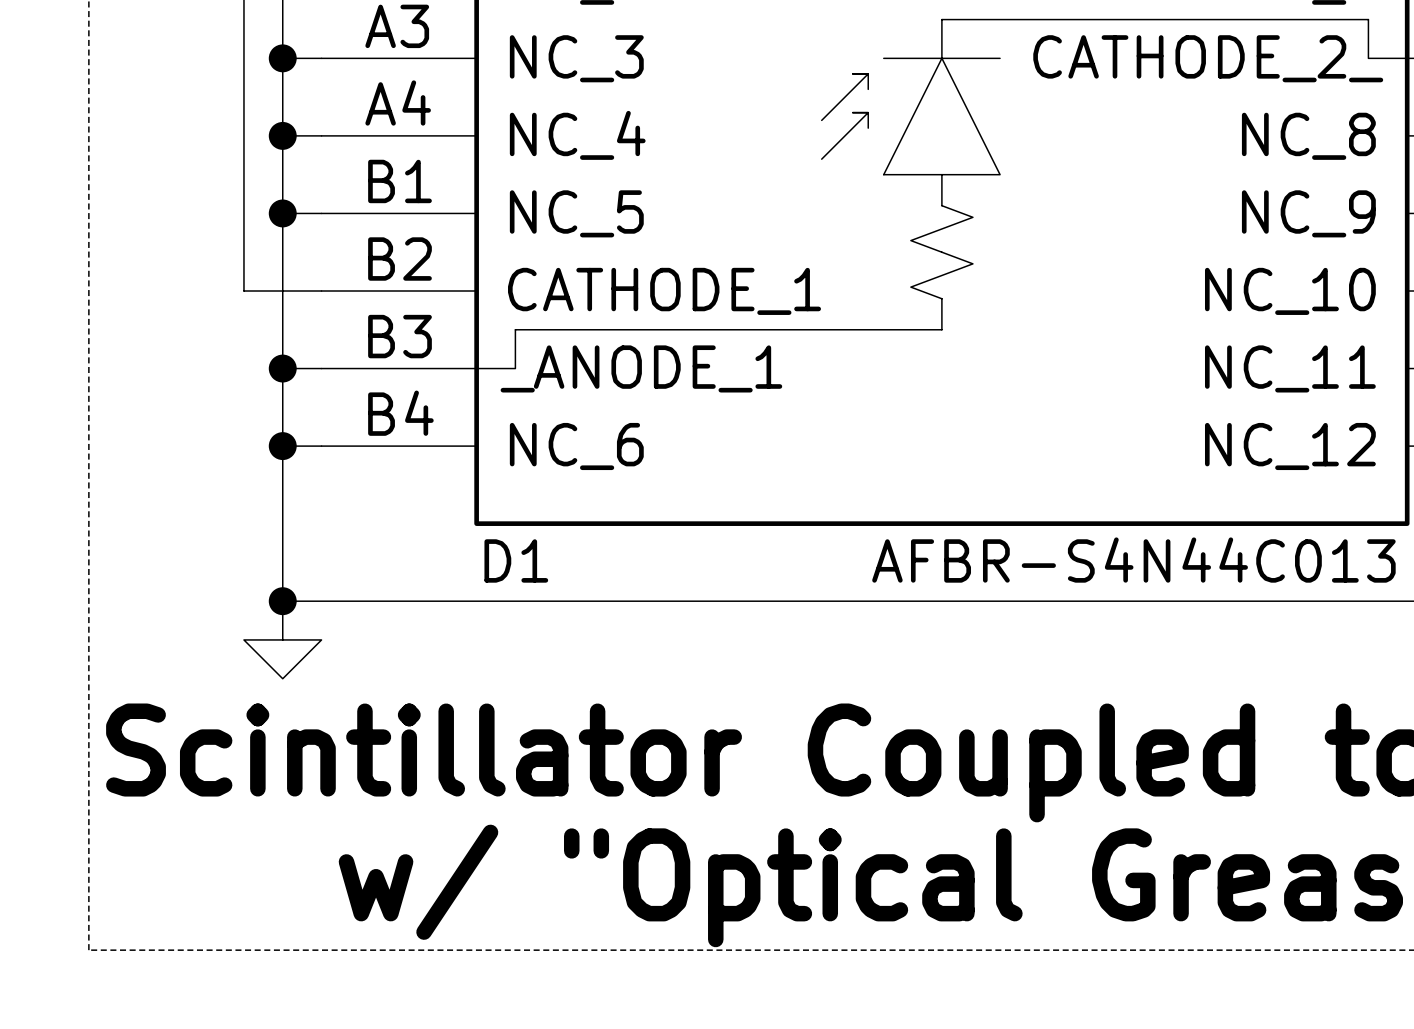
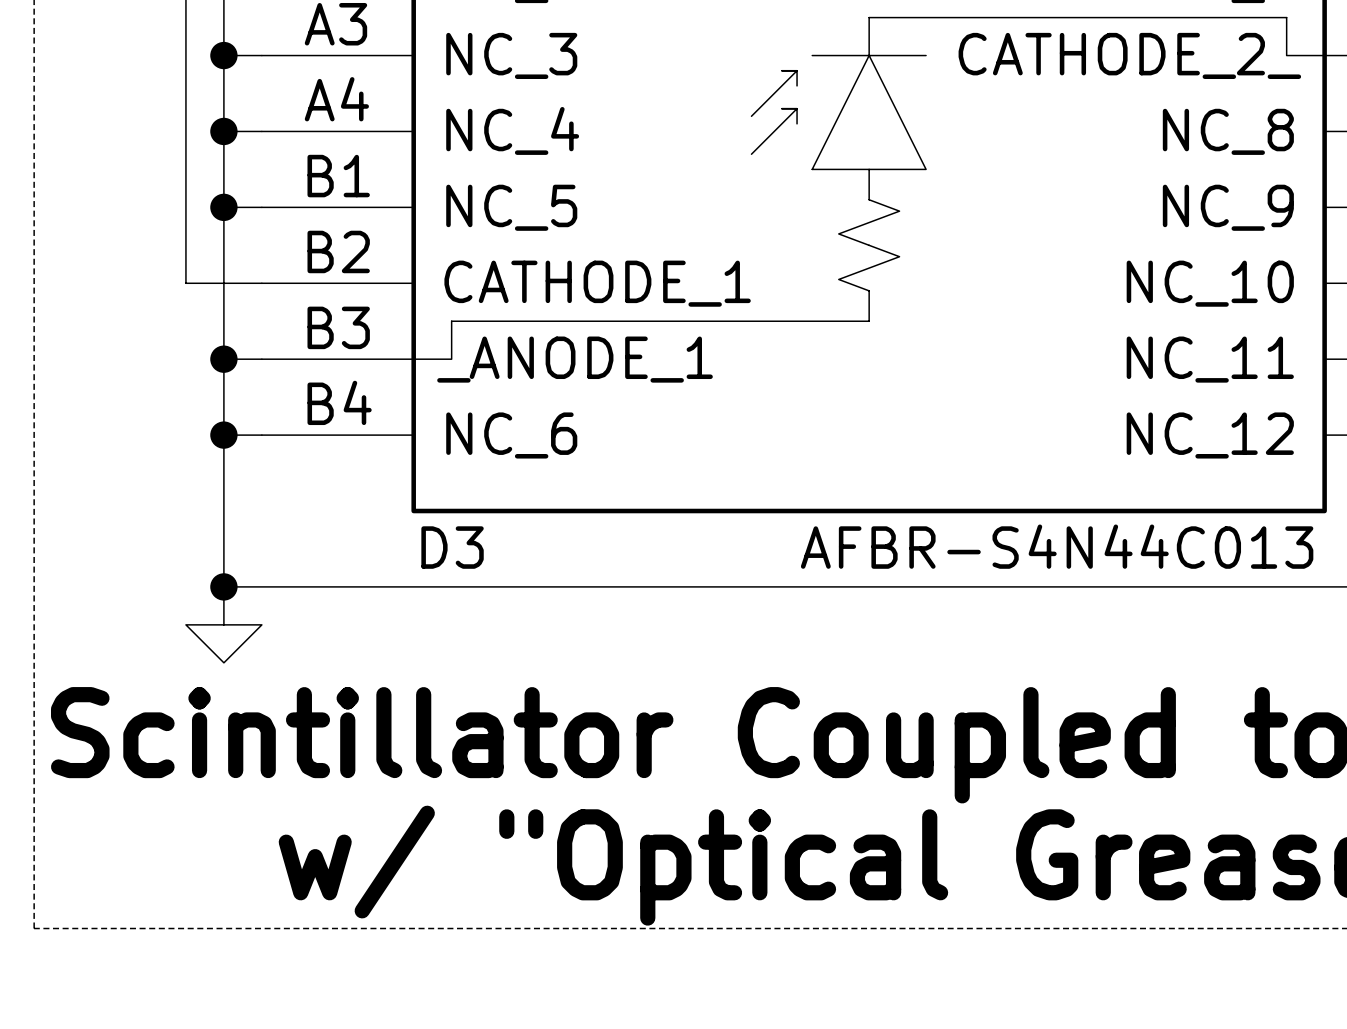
D1 name: D1 (516, 560) -> D3 (452, 547)

